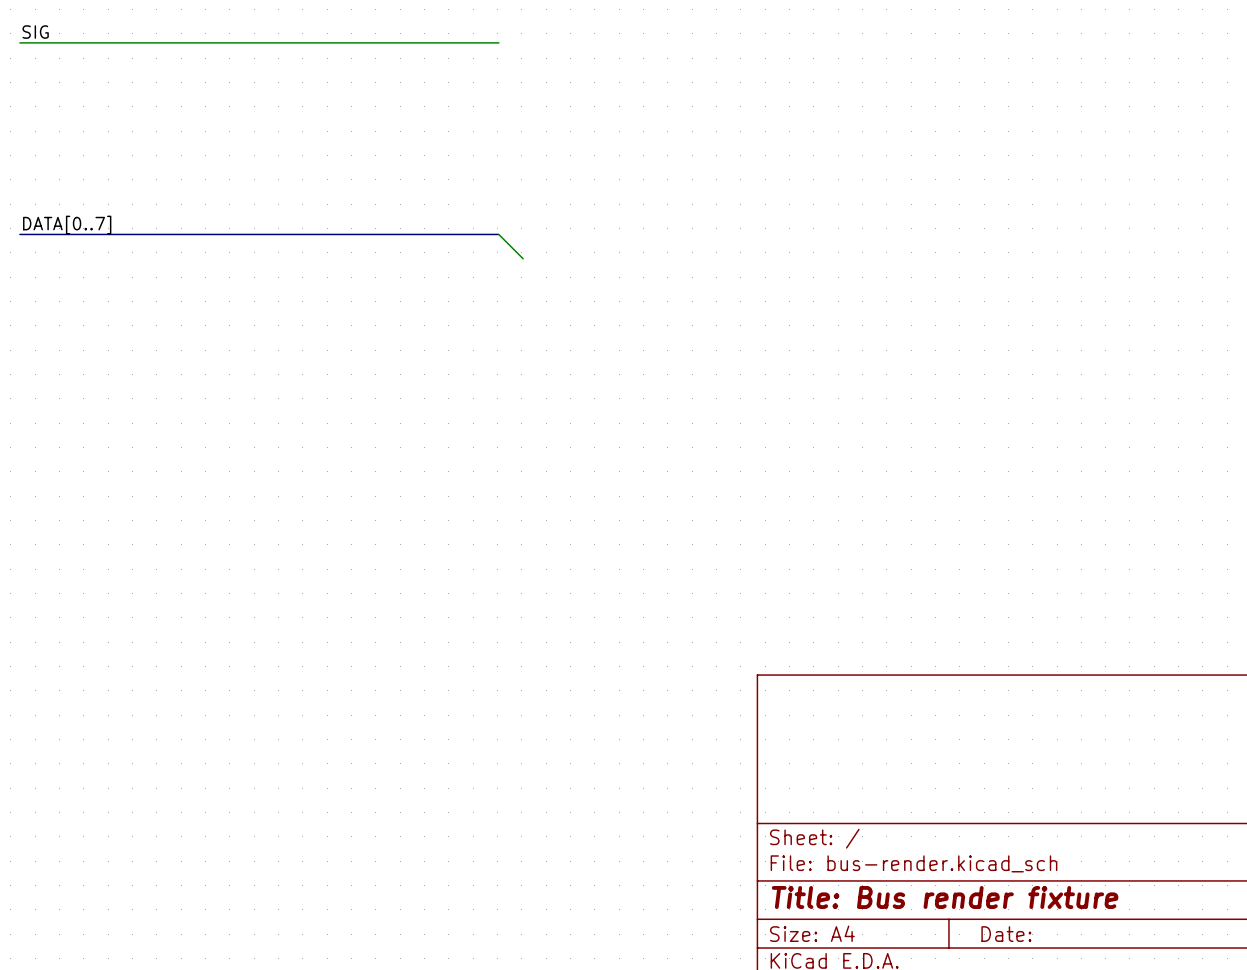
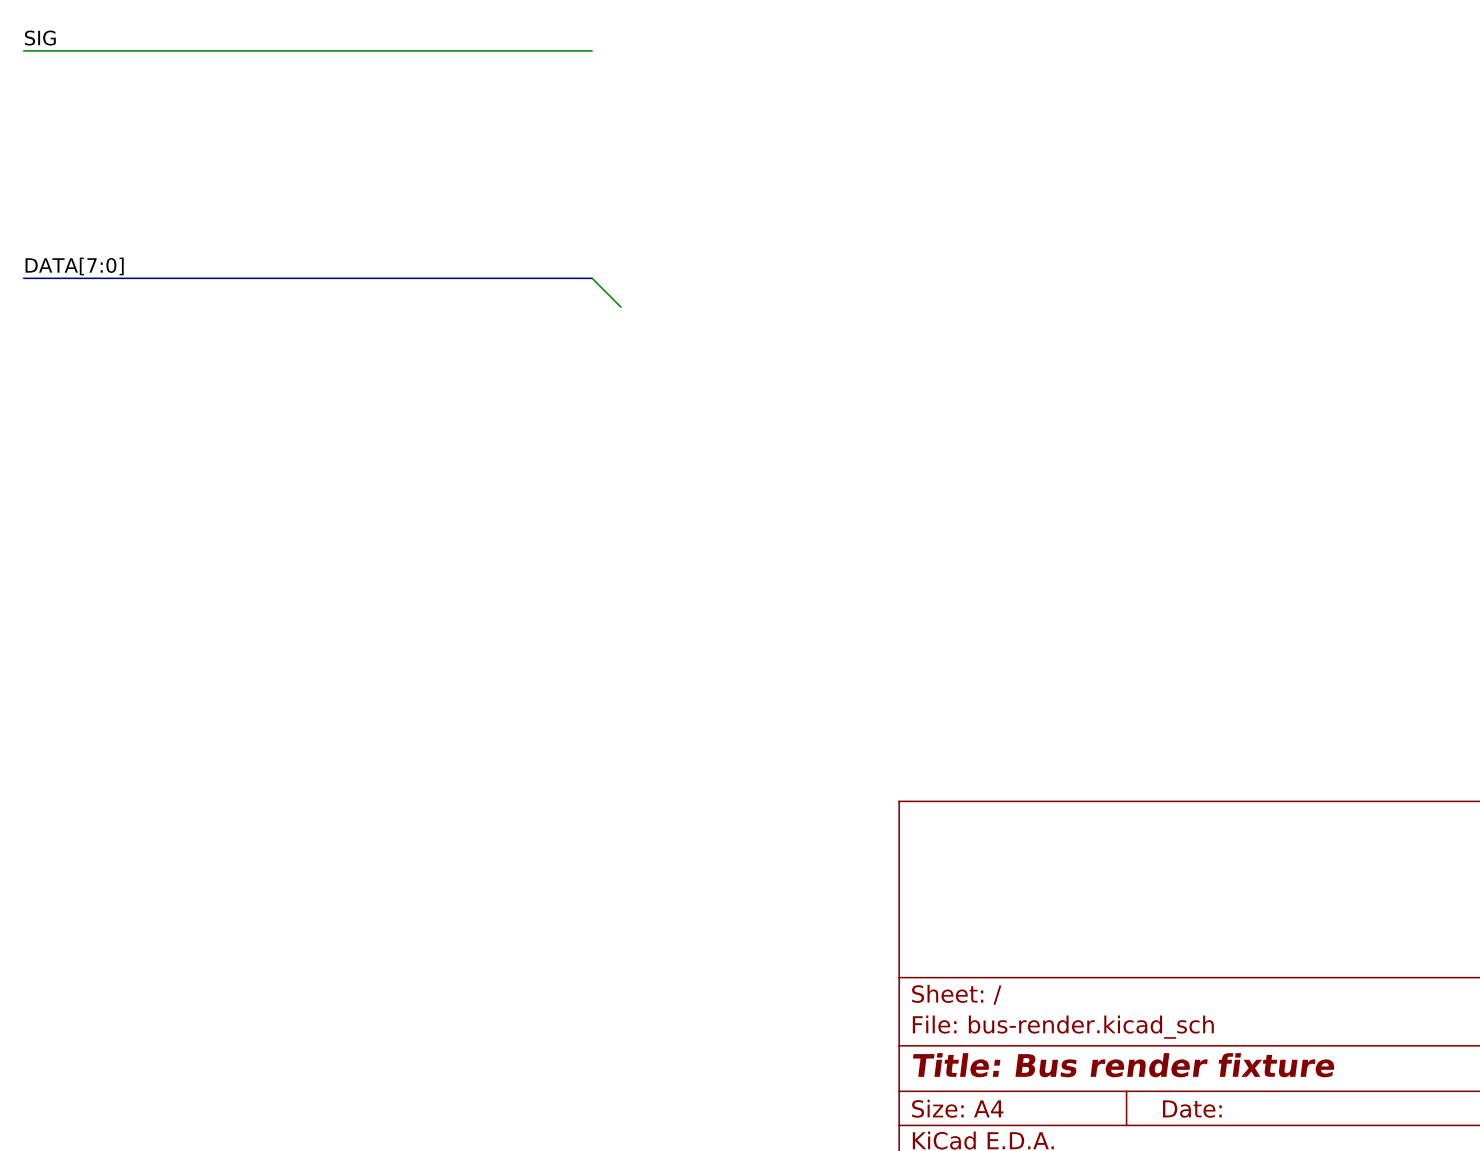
label: DATA[0..7] (67, 225) -> DATA[7:0] (74, 266)

